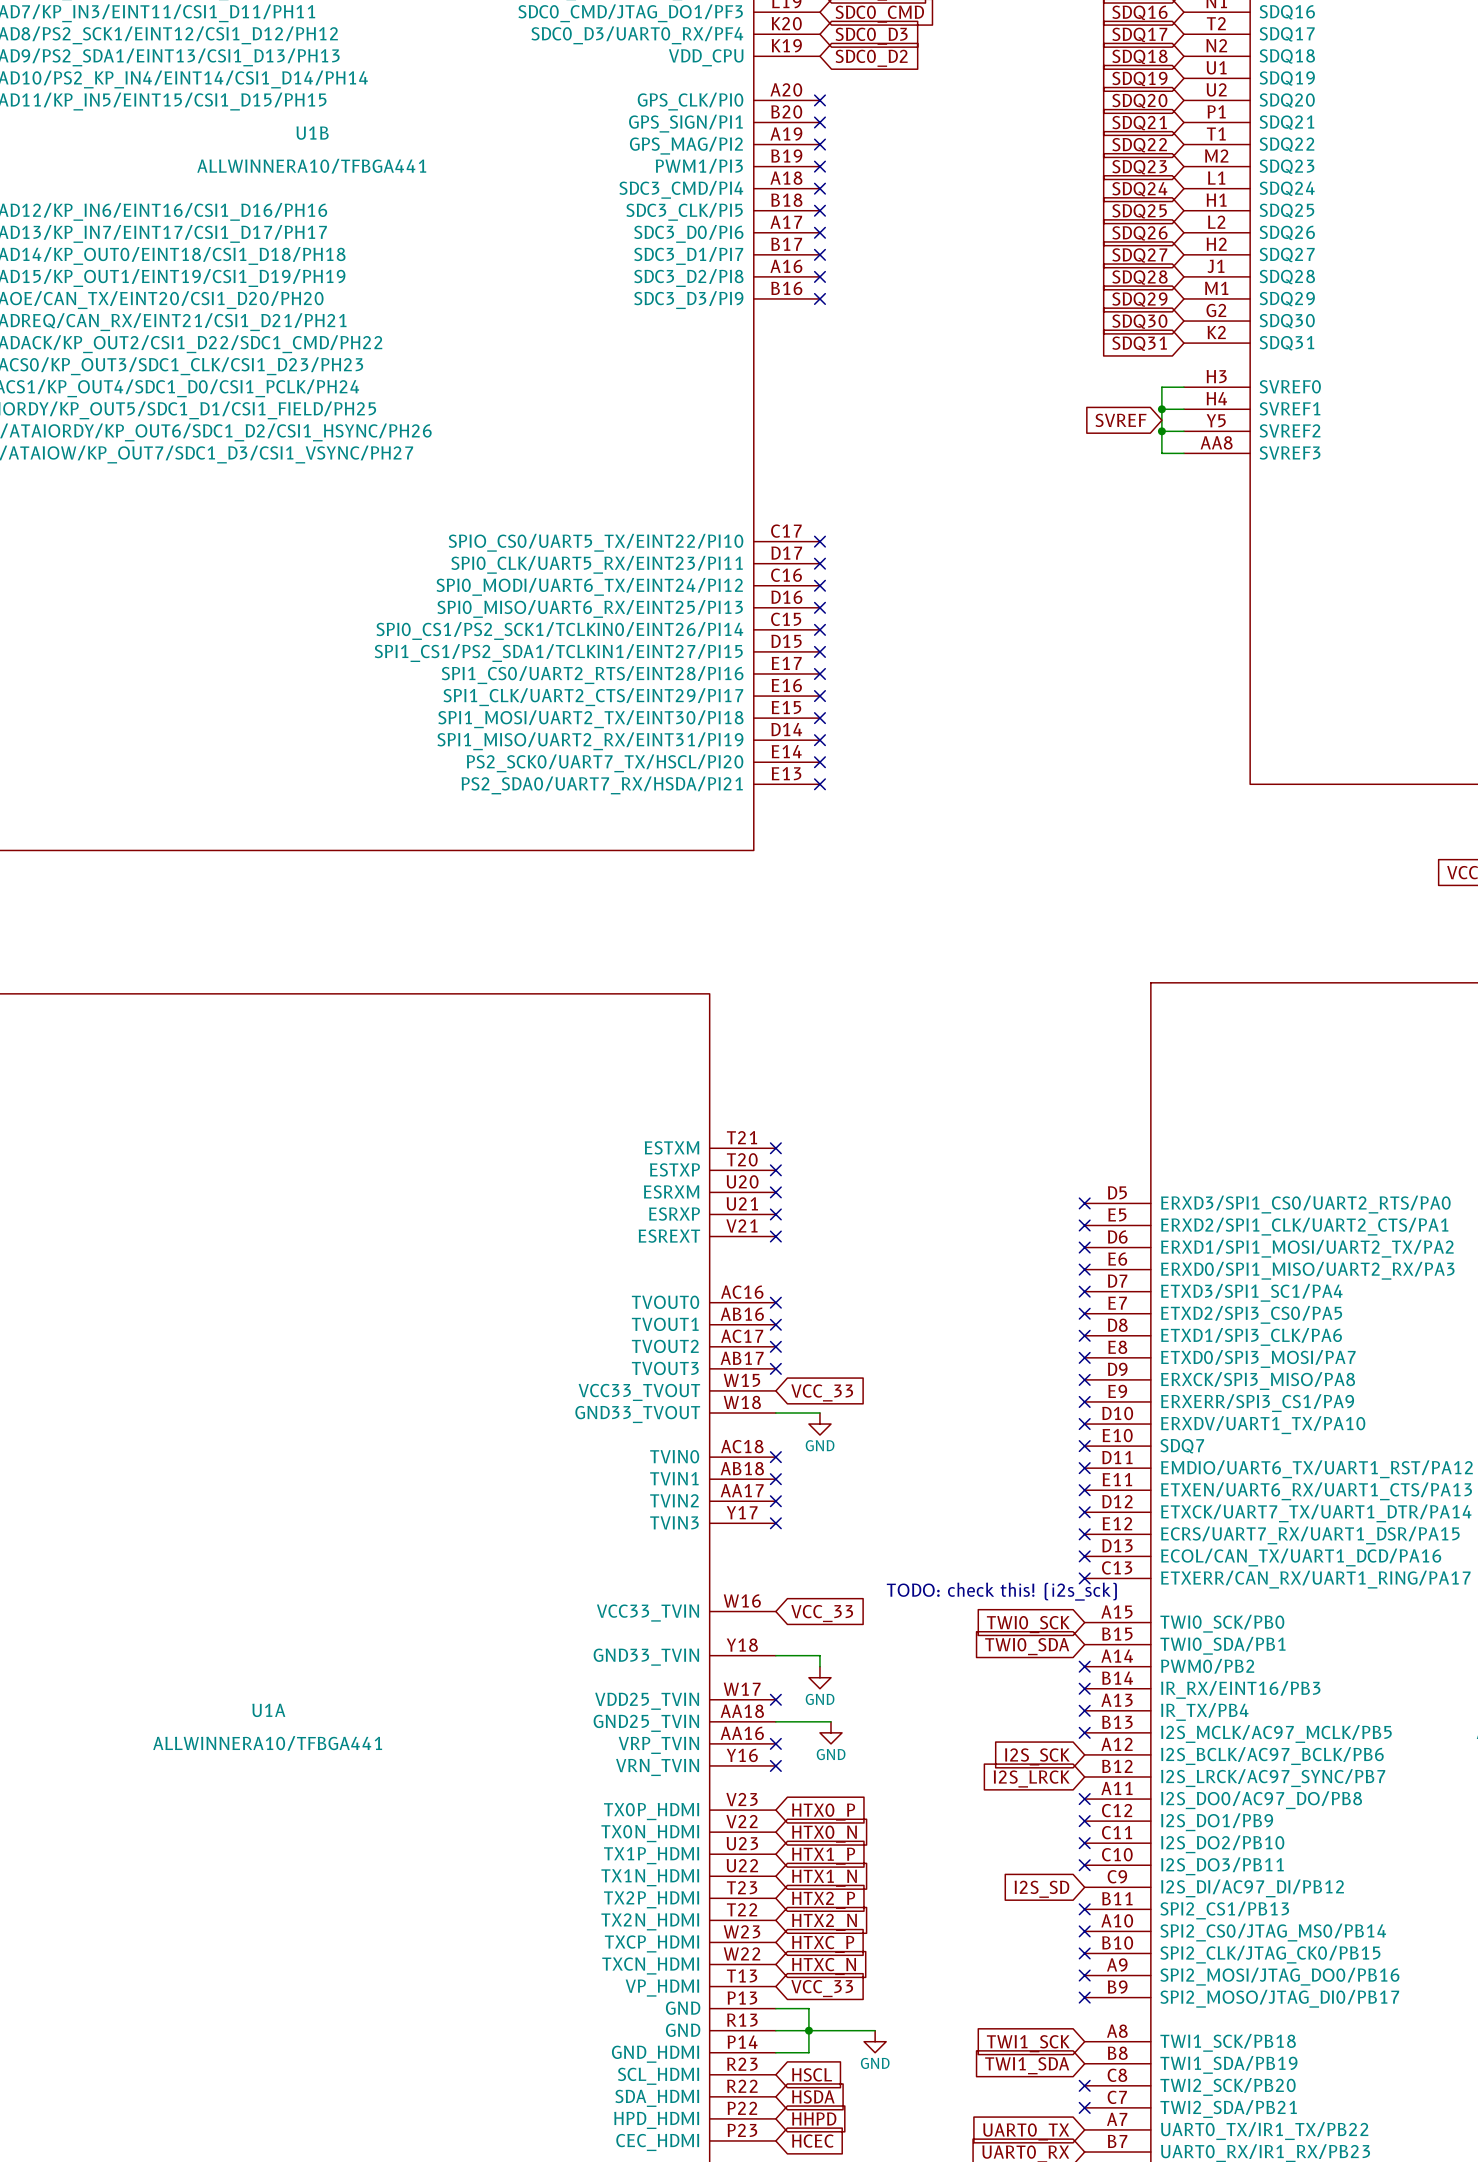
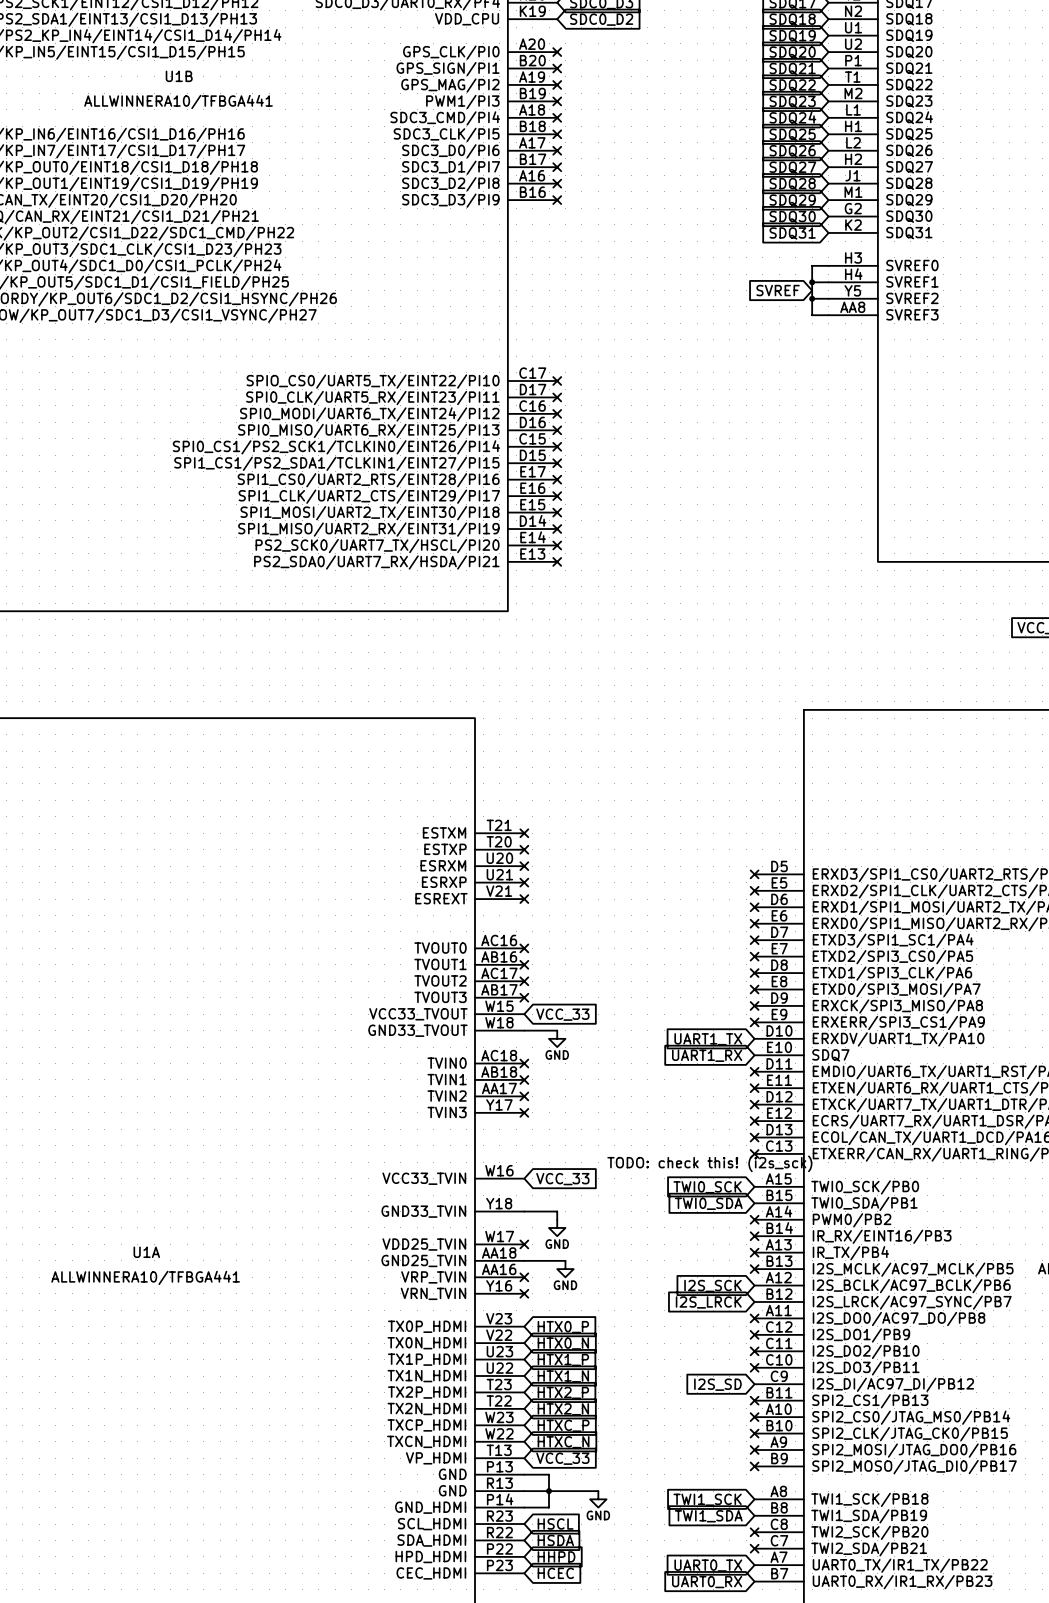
no-connect mark: (1084, 1424) -> none
global label: none -> UART1_TX (708, 1039)
no-connect mark: (1084, 1446) -> none
global label: none -> UART1_RX (707, 1055)

